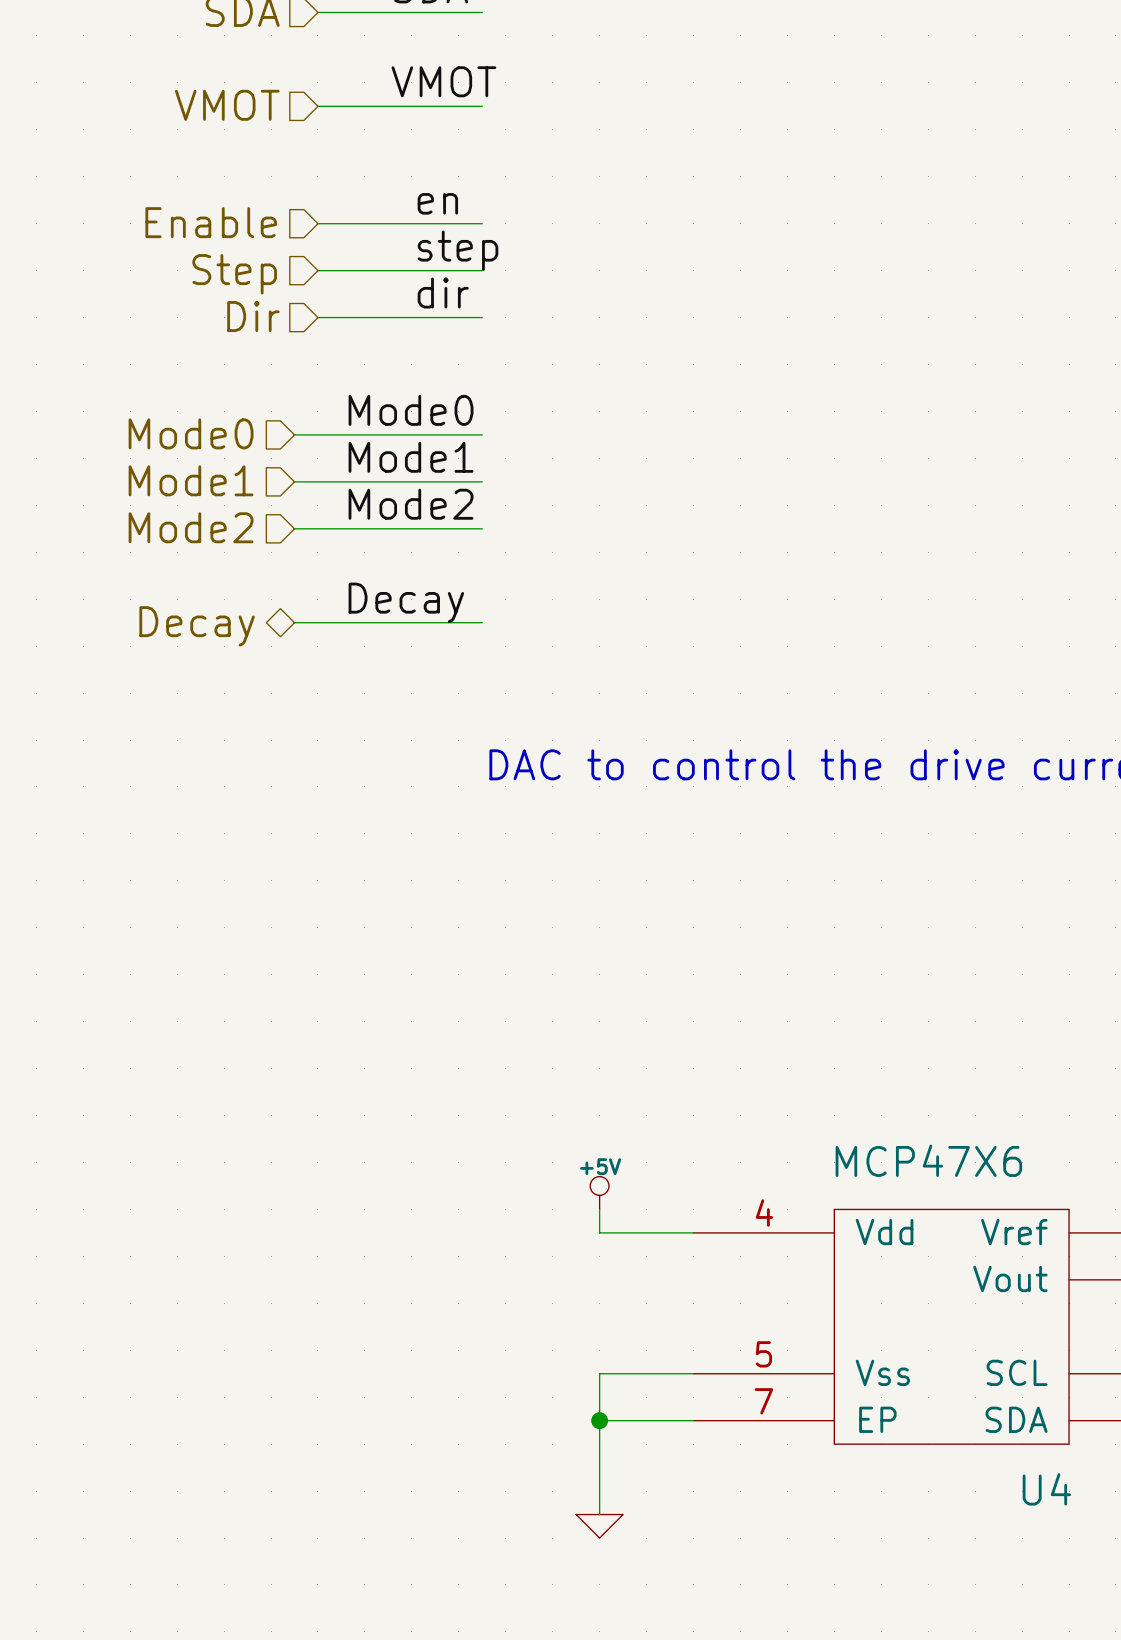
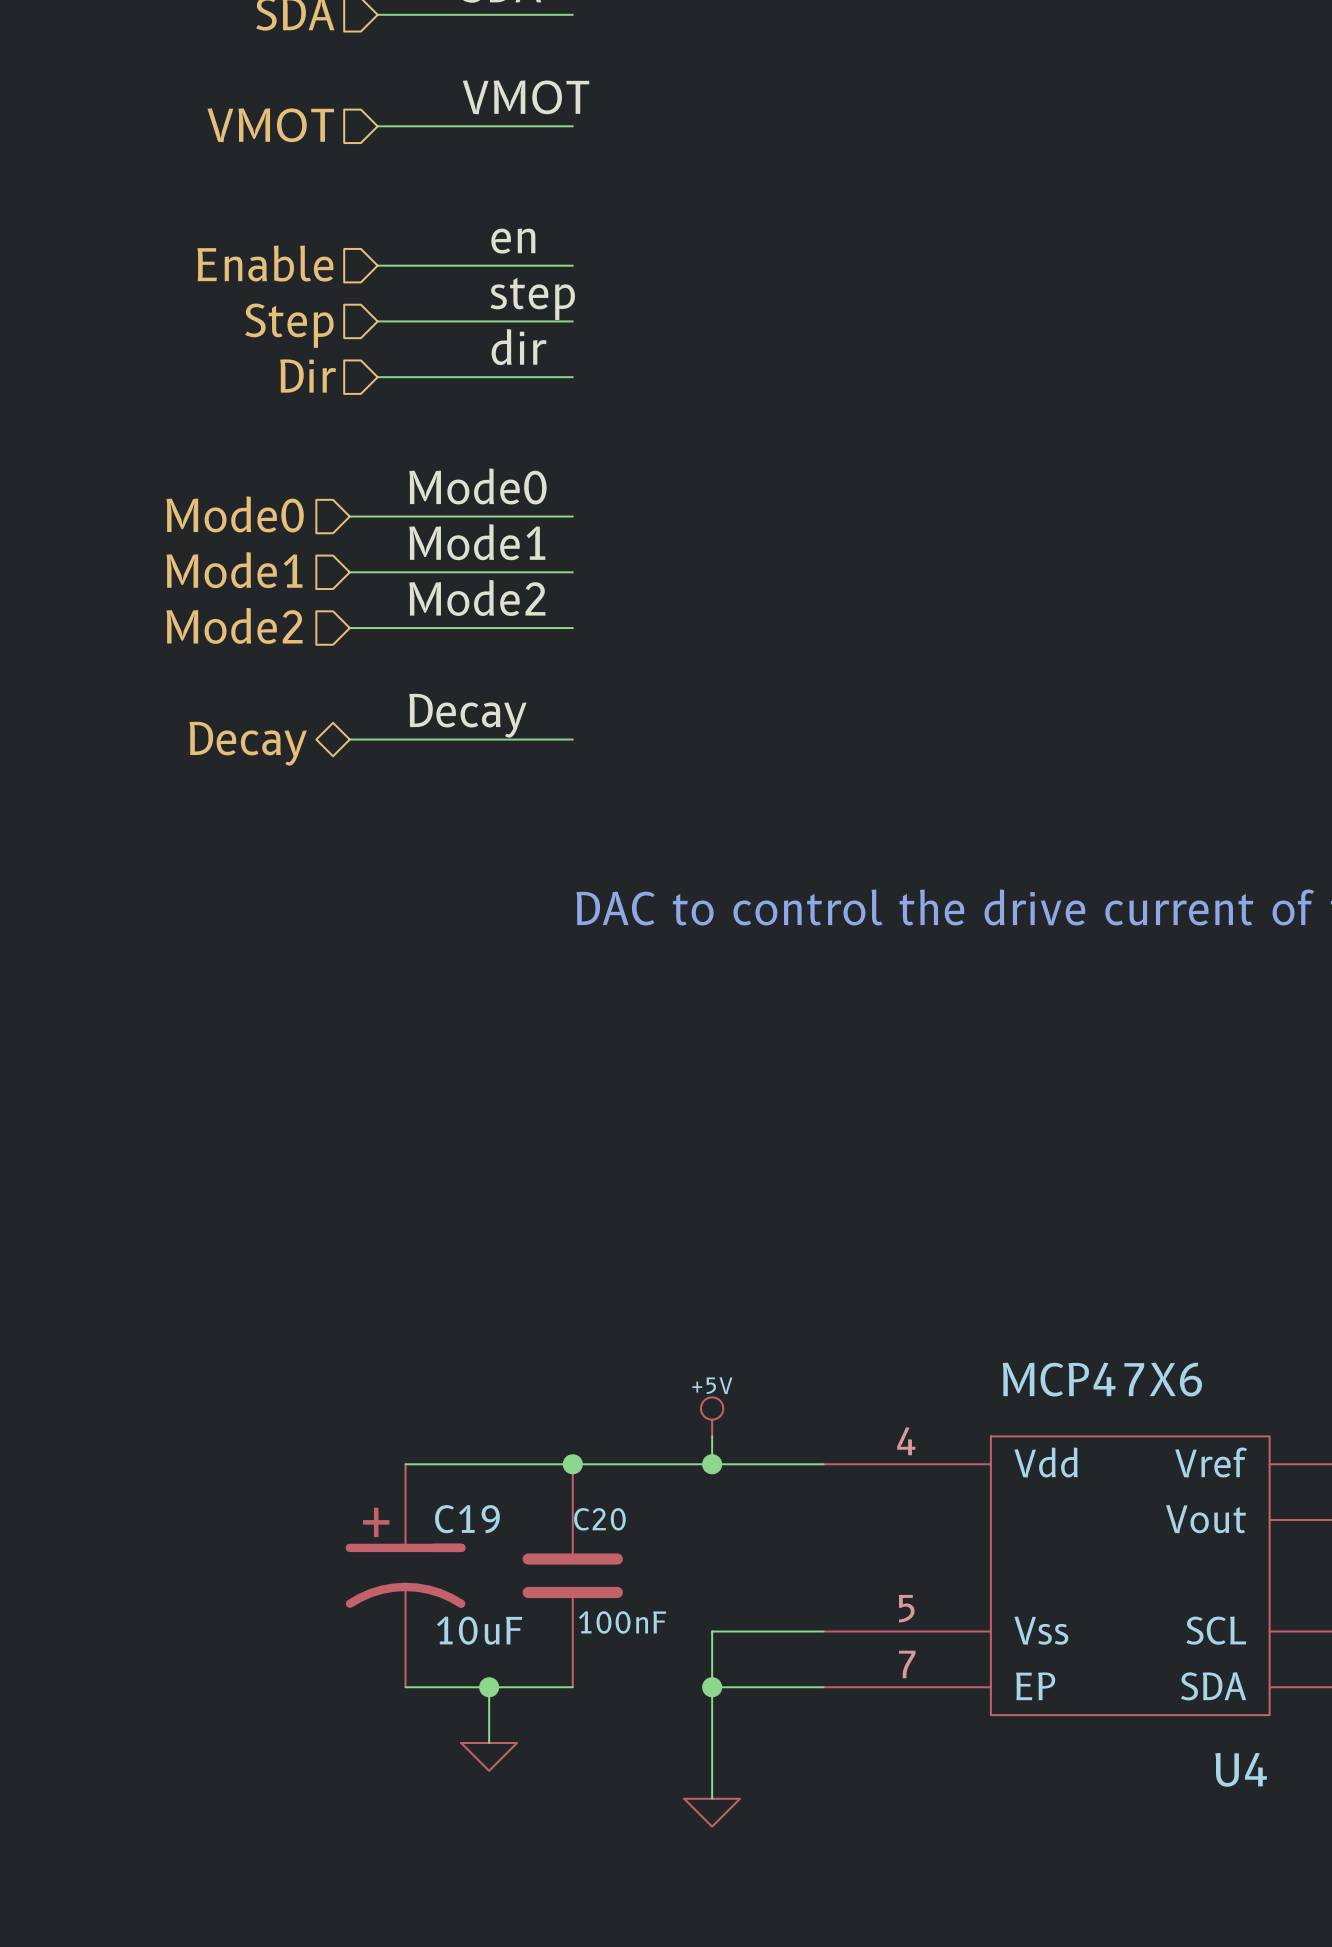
wire: none -> (405, 1464) (712, 1464)
junction: none -> (572, 1464)
junction: none -> (712, 1464)
C19: none -> 10uF (405, 1575)
C20: none -> 100nF (572, 1575)
wire: none -> (405, 1687) (572, 1687)
wire: none -> (489, 1687) (489, 1743)
junction: none -> (489, 1687)
power symbol: none -> (489, 1756)

